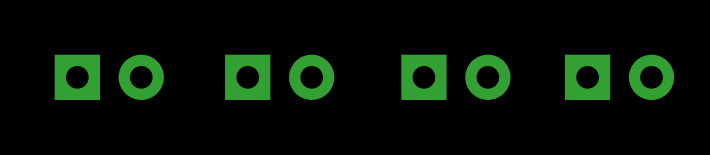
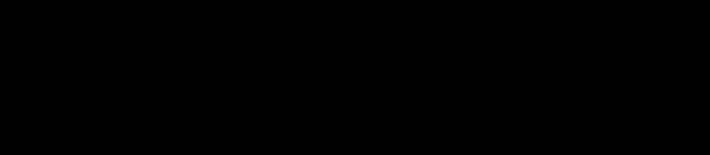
part: (109, 77) -> none
part: (279, 77) -> none
part: (455, 77) -> none
part: (619, 77) -> none

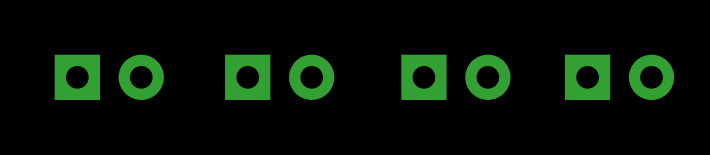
part: none -> (109, 77)
part: none -> (279, 77)
part: none -> (455, 77)
part: none -> (619, 77)

